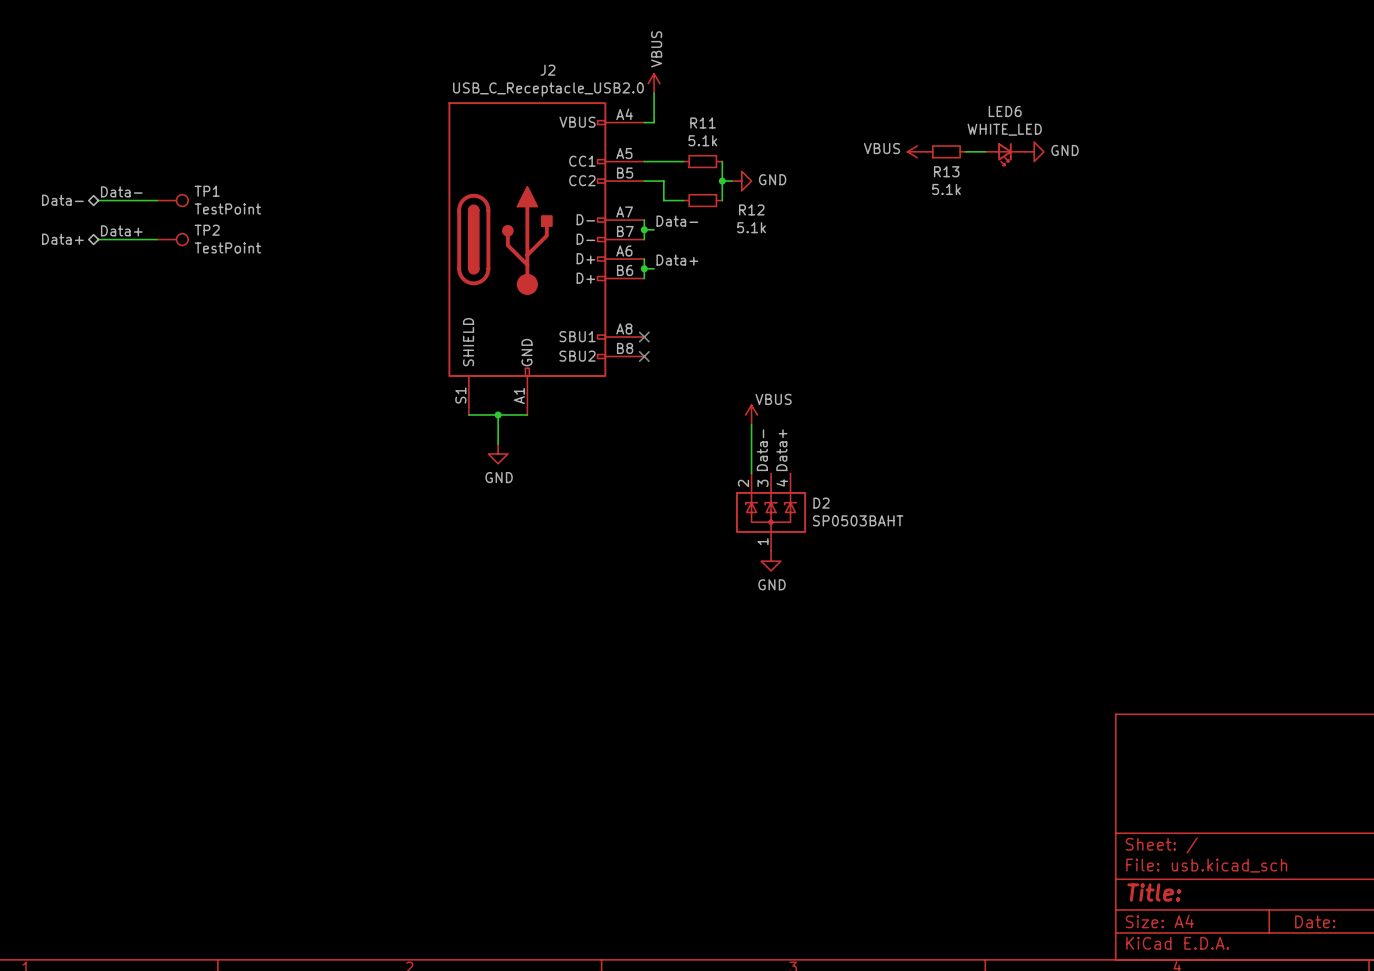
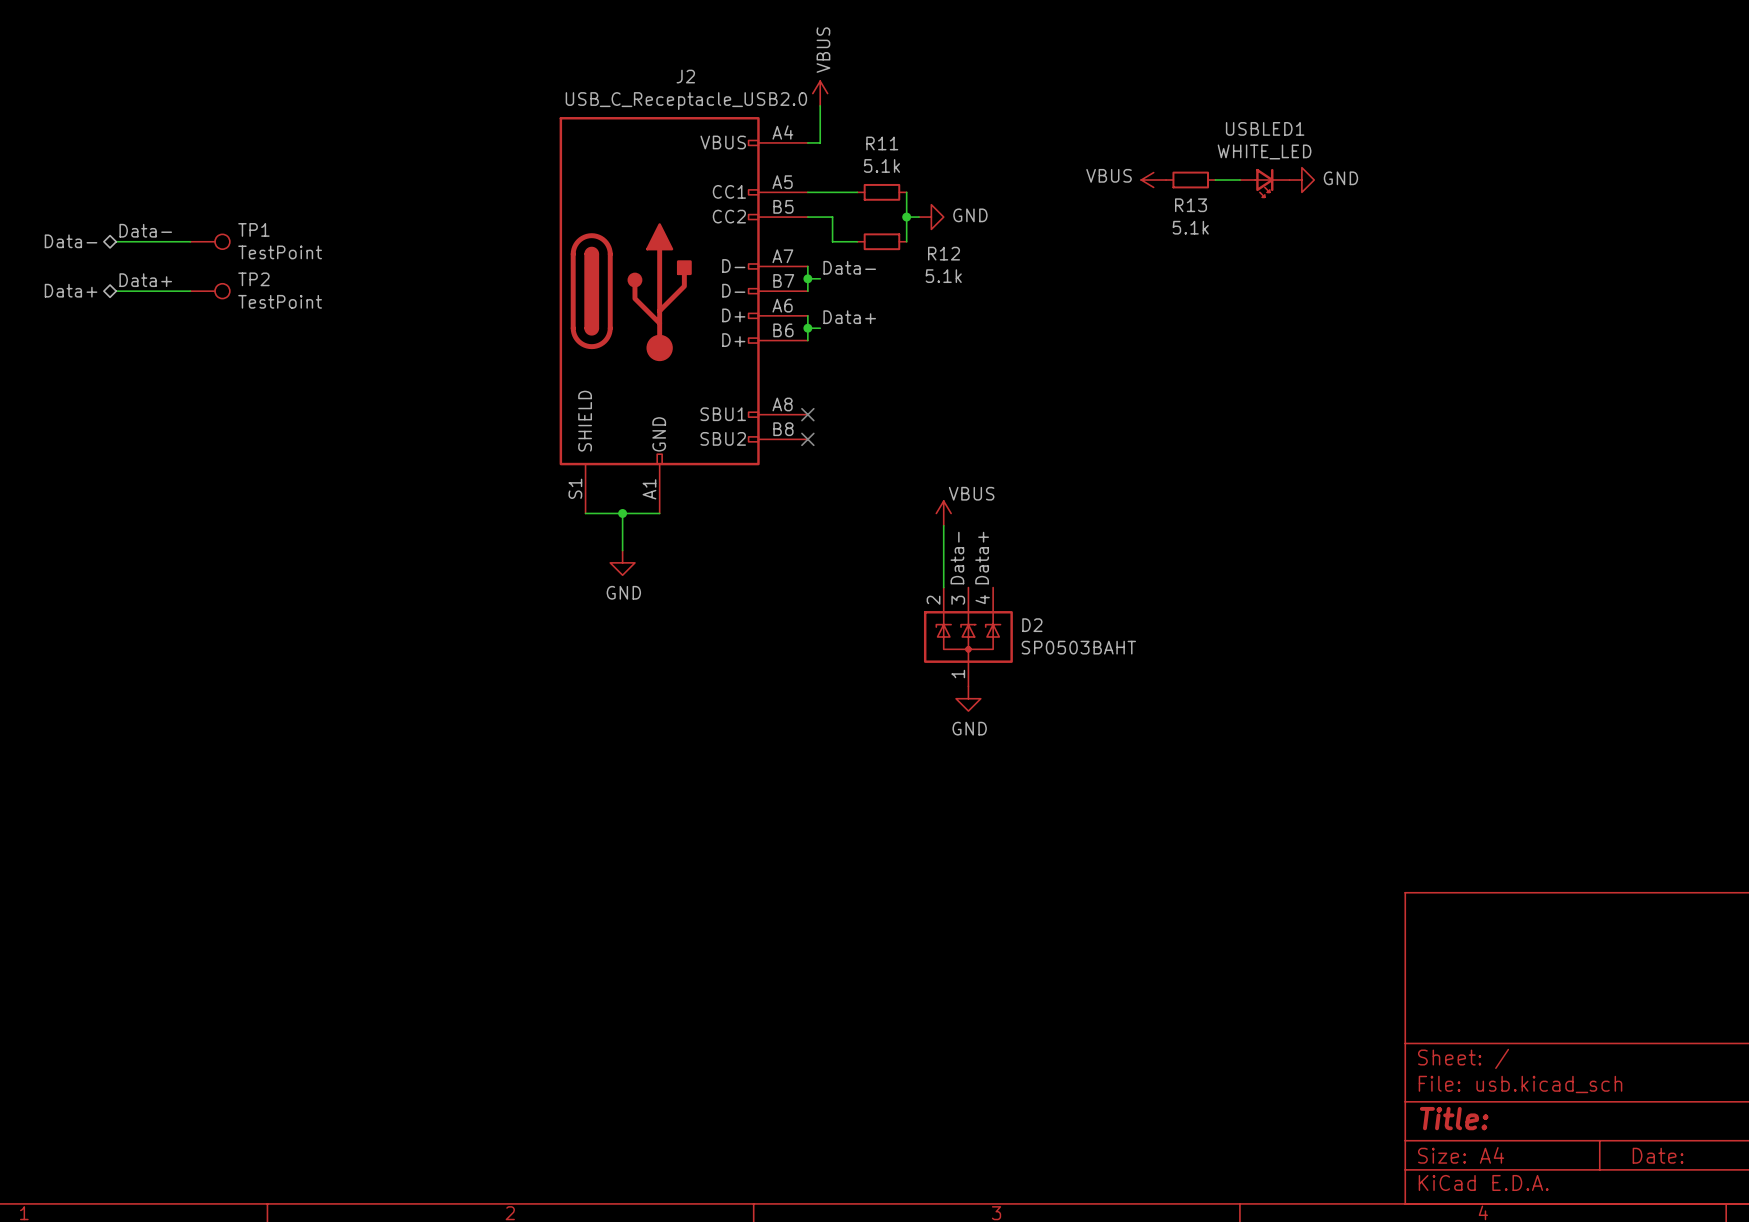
LED6 name: LED6 (1005, 111) -> USBLED1 (1265, 128)

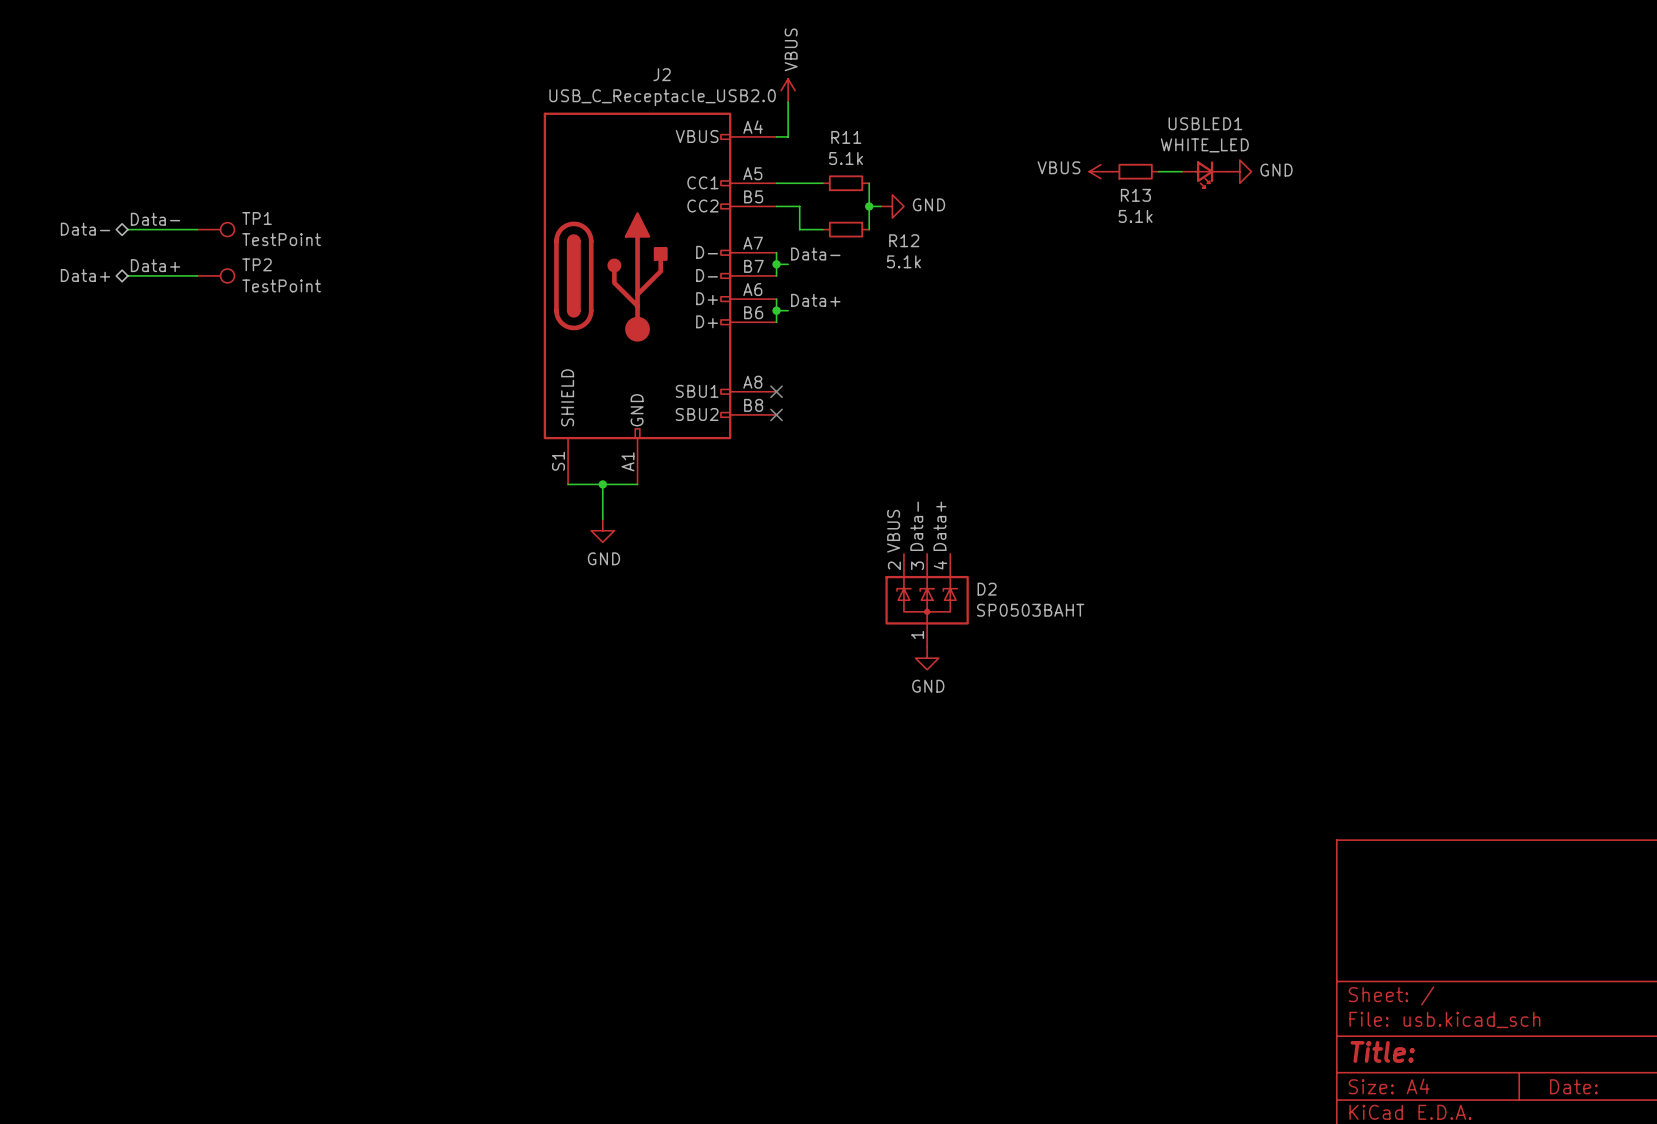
power symbol: VBUS (943, 513) -> none
wire: (943, 525) (943, 587) -> none
label: none -> VBUS (893, 531)

